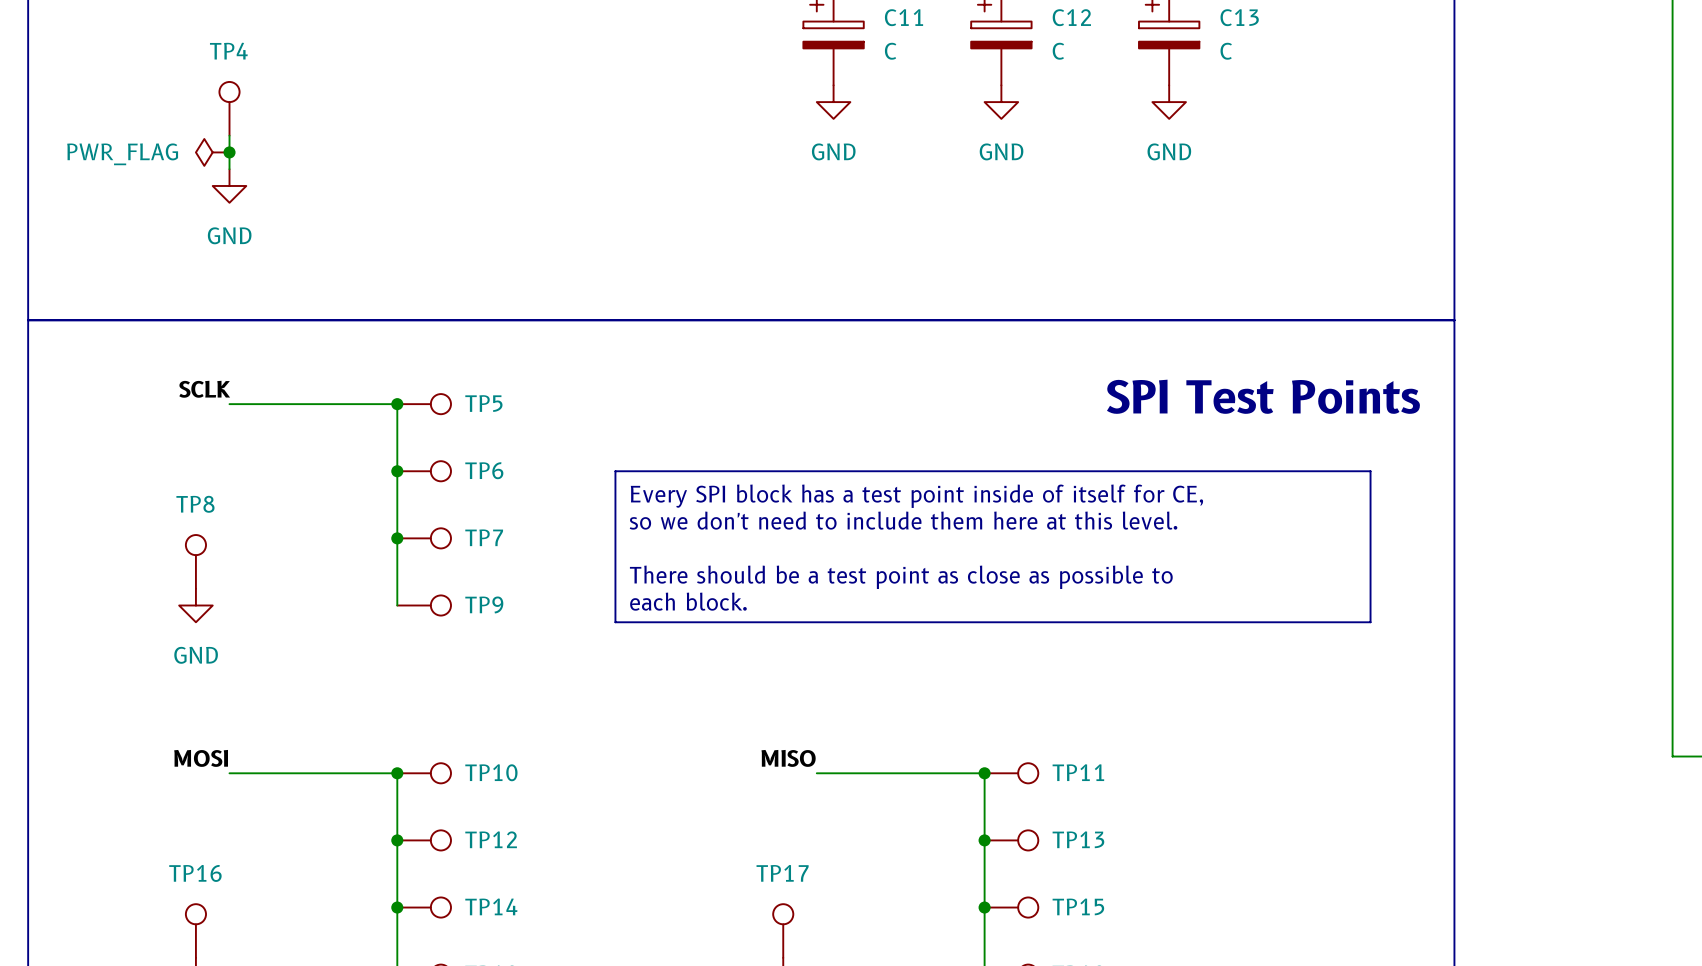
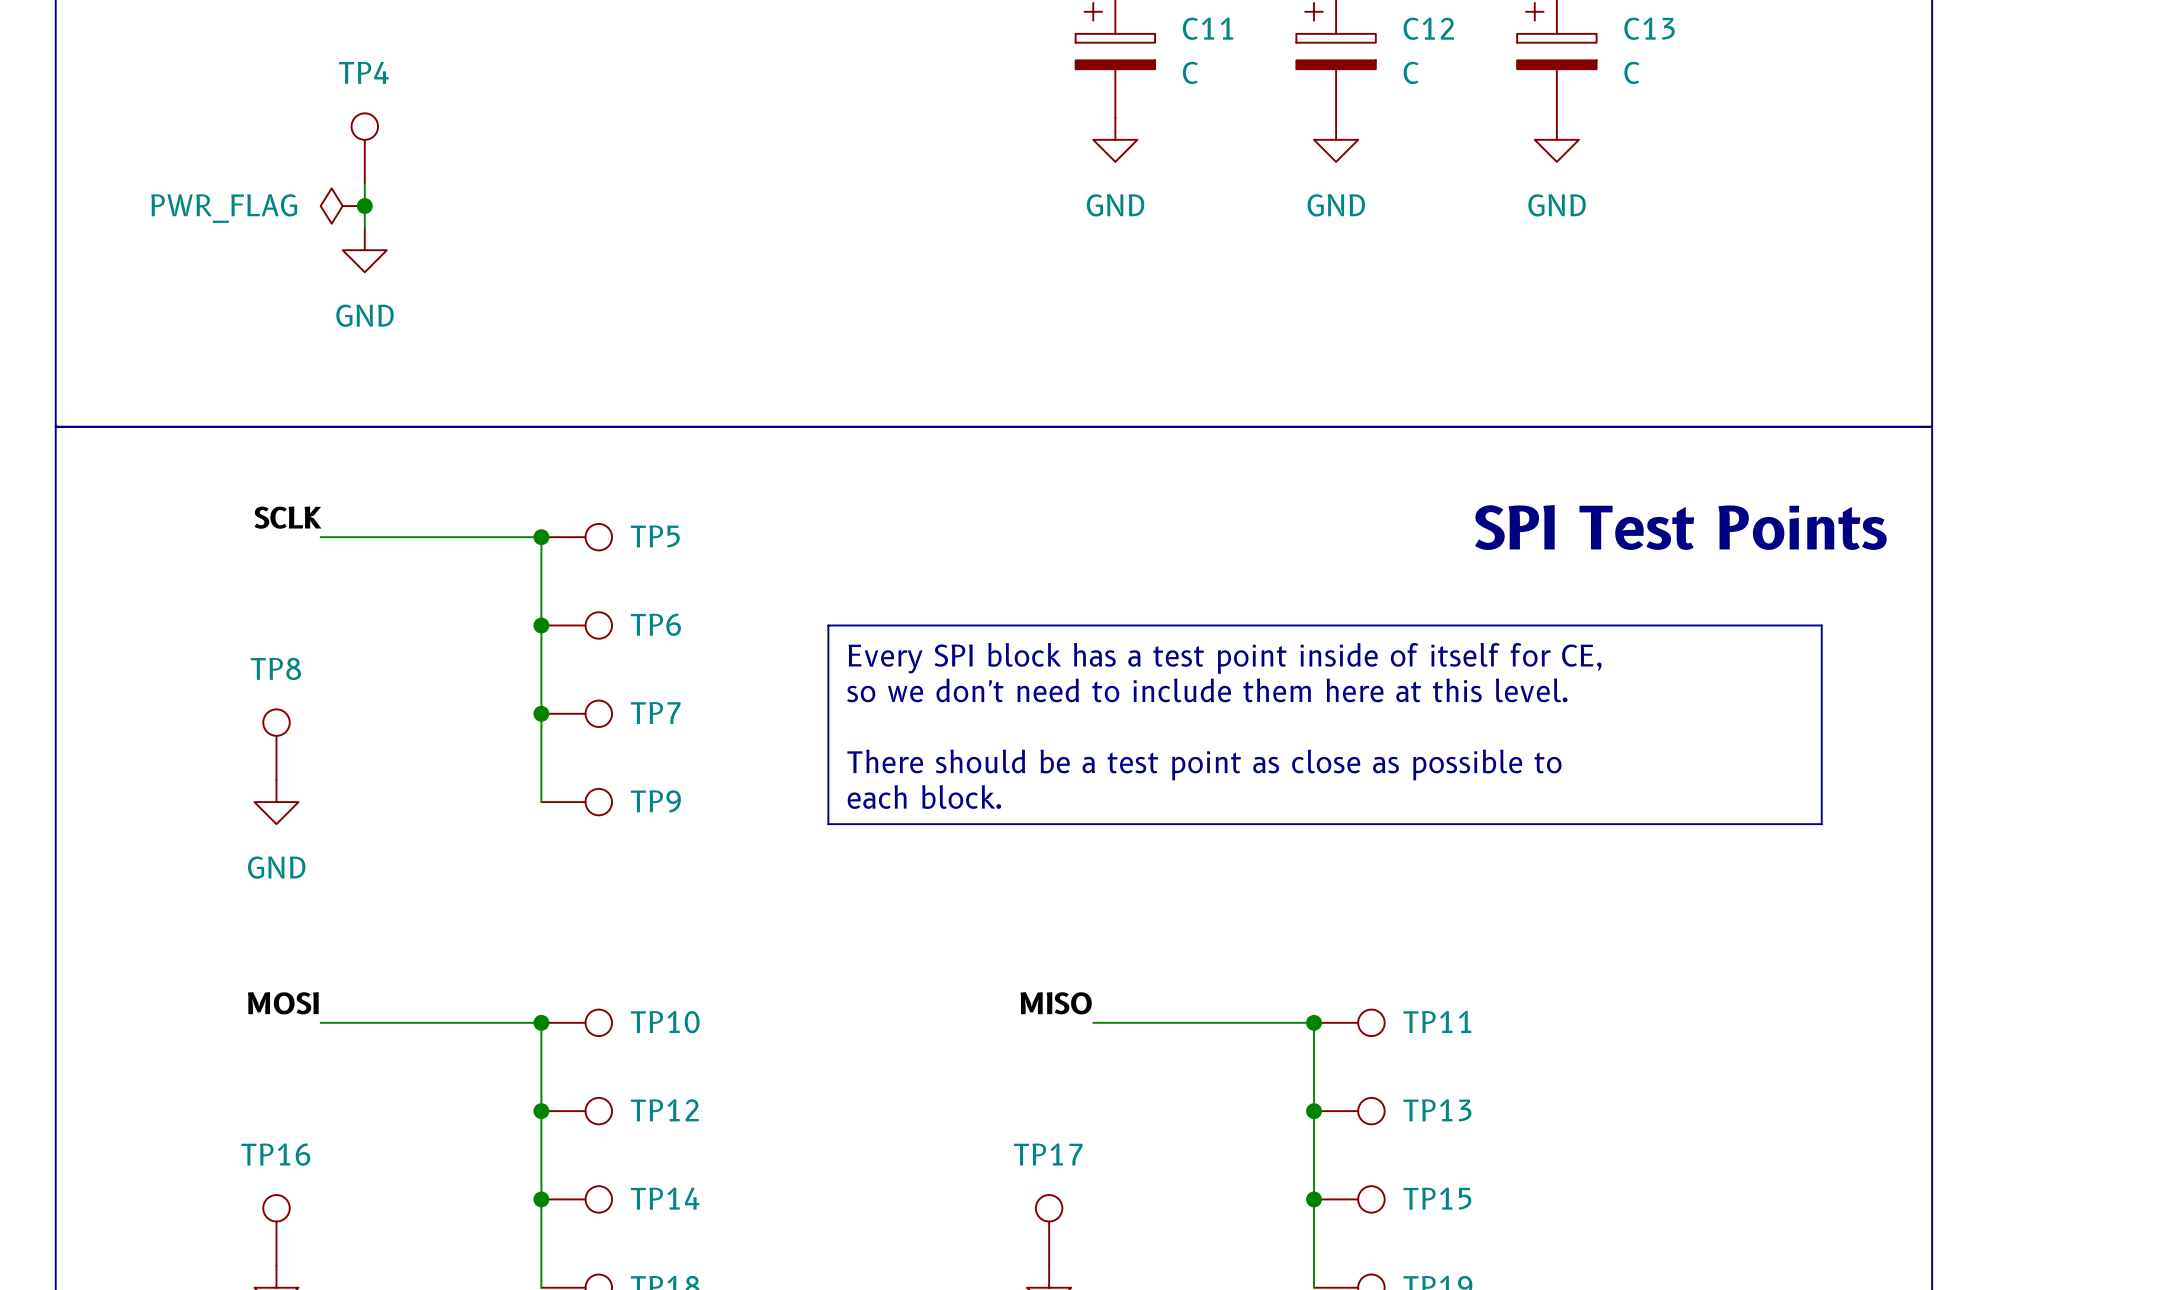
TP4 position: (229, 108) -> (364, 148)
wire: (229, 135) (229, 169) -> (364, 183) (364, 228)
power symbol position: PWR_FLAG (212, 152) -> PWR_FLAG (342, 206)
junction position: (229, 152) -> (364, 206)
power symbol position: GND (229, 185) -> GND (364, 250)

